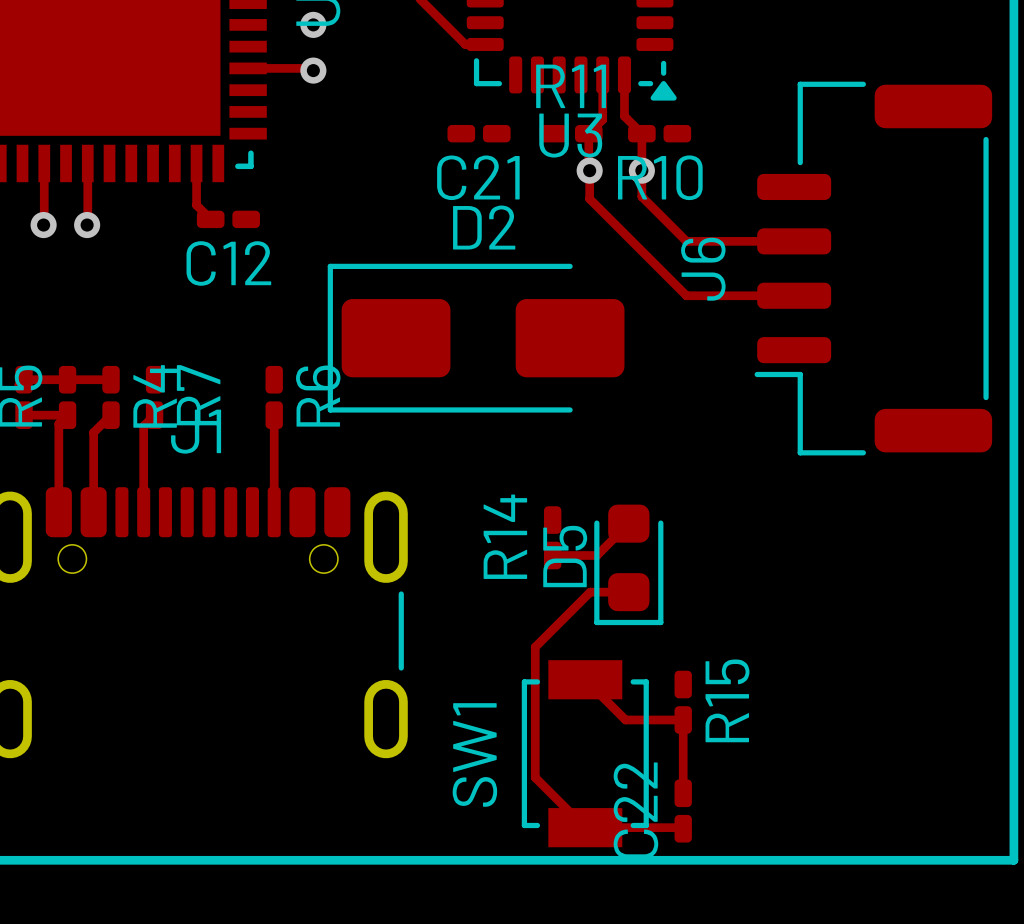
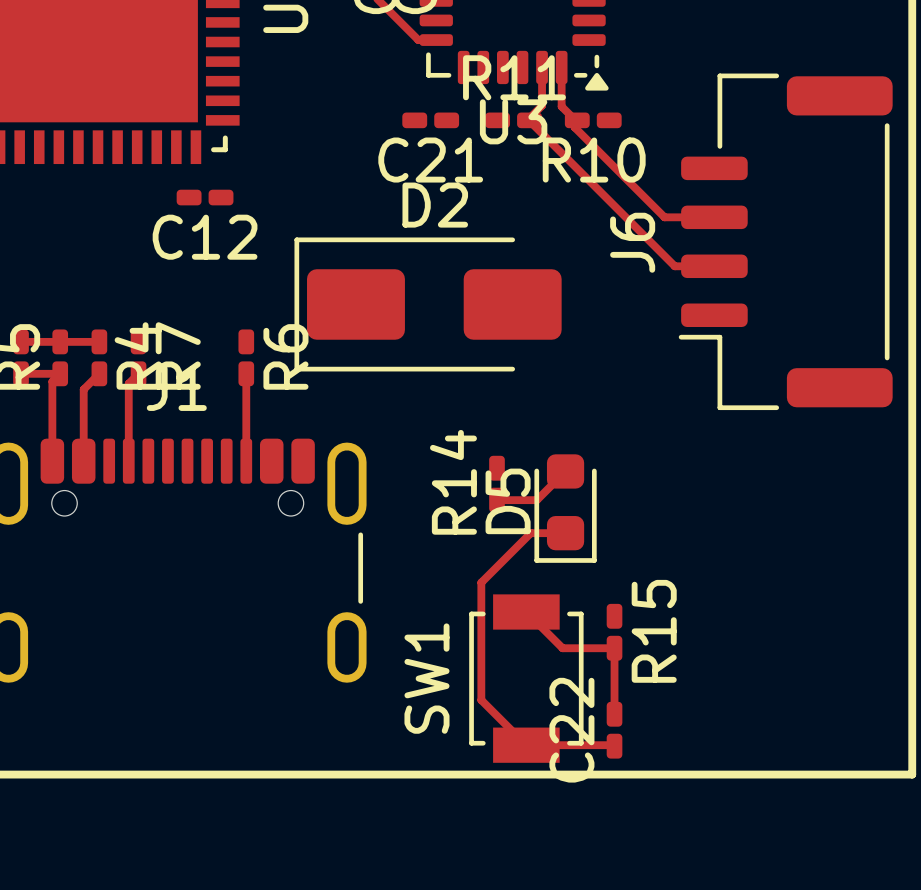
via: (313, 24) -> none
top track: (248, 68) (311, 68) (313, 70) -> none
via: (313, 70) -> none
top track: (624, 116) (641, 133) (641, 196) (686, 241) (738, 241) -> (561, 104) (574, 119) (574, 127) (664, 217)
top track: (602, 117) (602, 119) (588, 133) (589, 198) (686, 295) (750, 295) -> (542, 105) (528, 119) (674, 266)
top track: (44, 163) (43, 225) -> none
top track: (87, 163) (87, 225) -> none
top track: (196, 163) (196, 205) (210, 219) -> none
via: (589, 170) -> none
via: (641, 170) -> none
via: (43, 225) -> none
via: (87, 225) -> none

